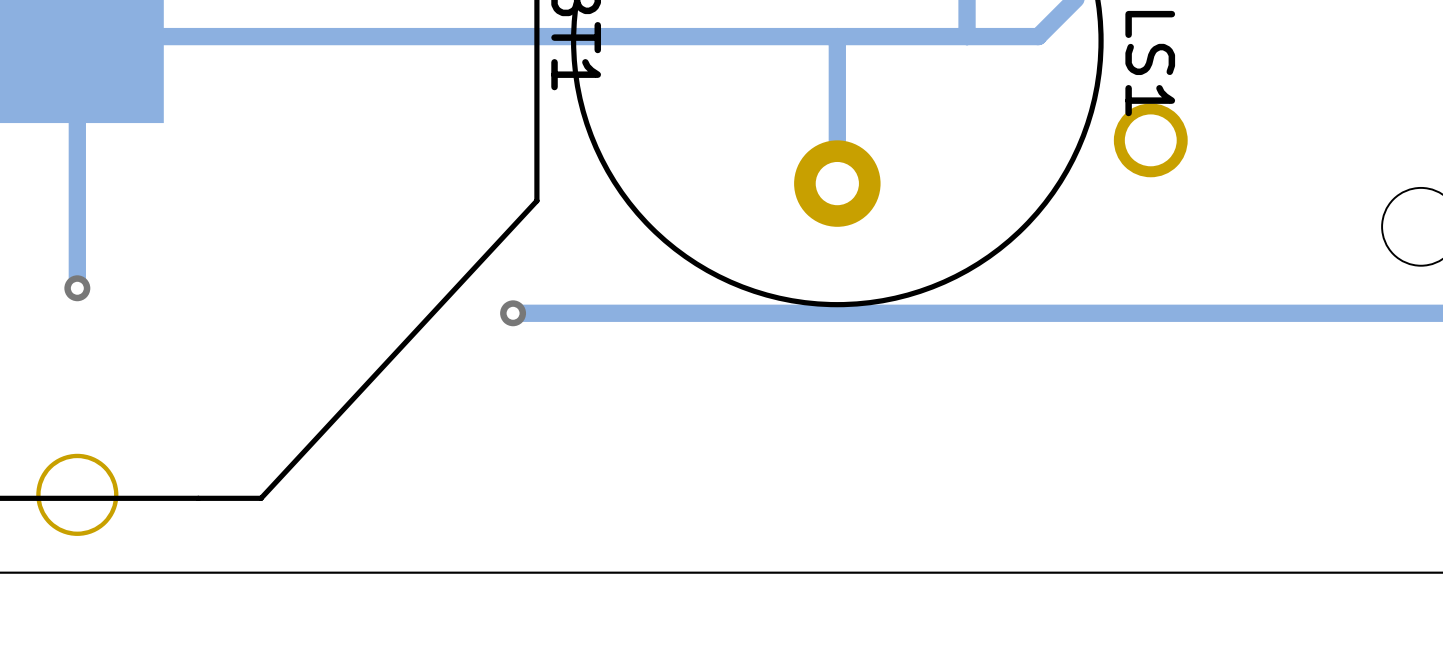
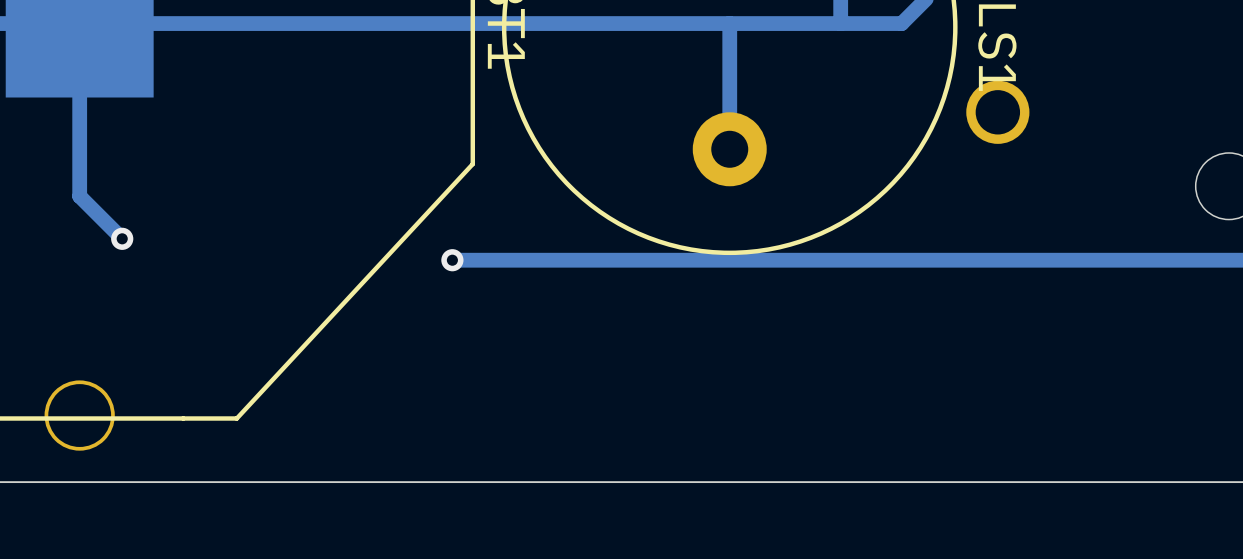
track: (77, 238) (77, 288) -> (79, 196) (122, 238)
via position: (77, 288) -> (122, 238)

